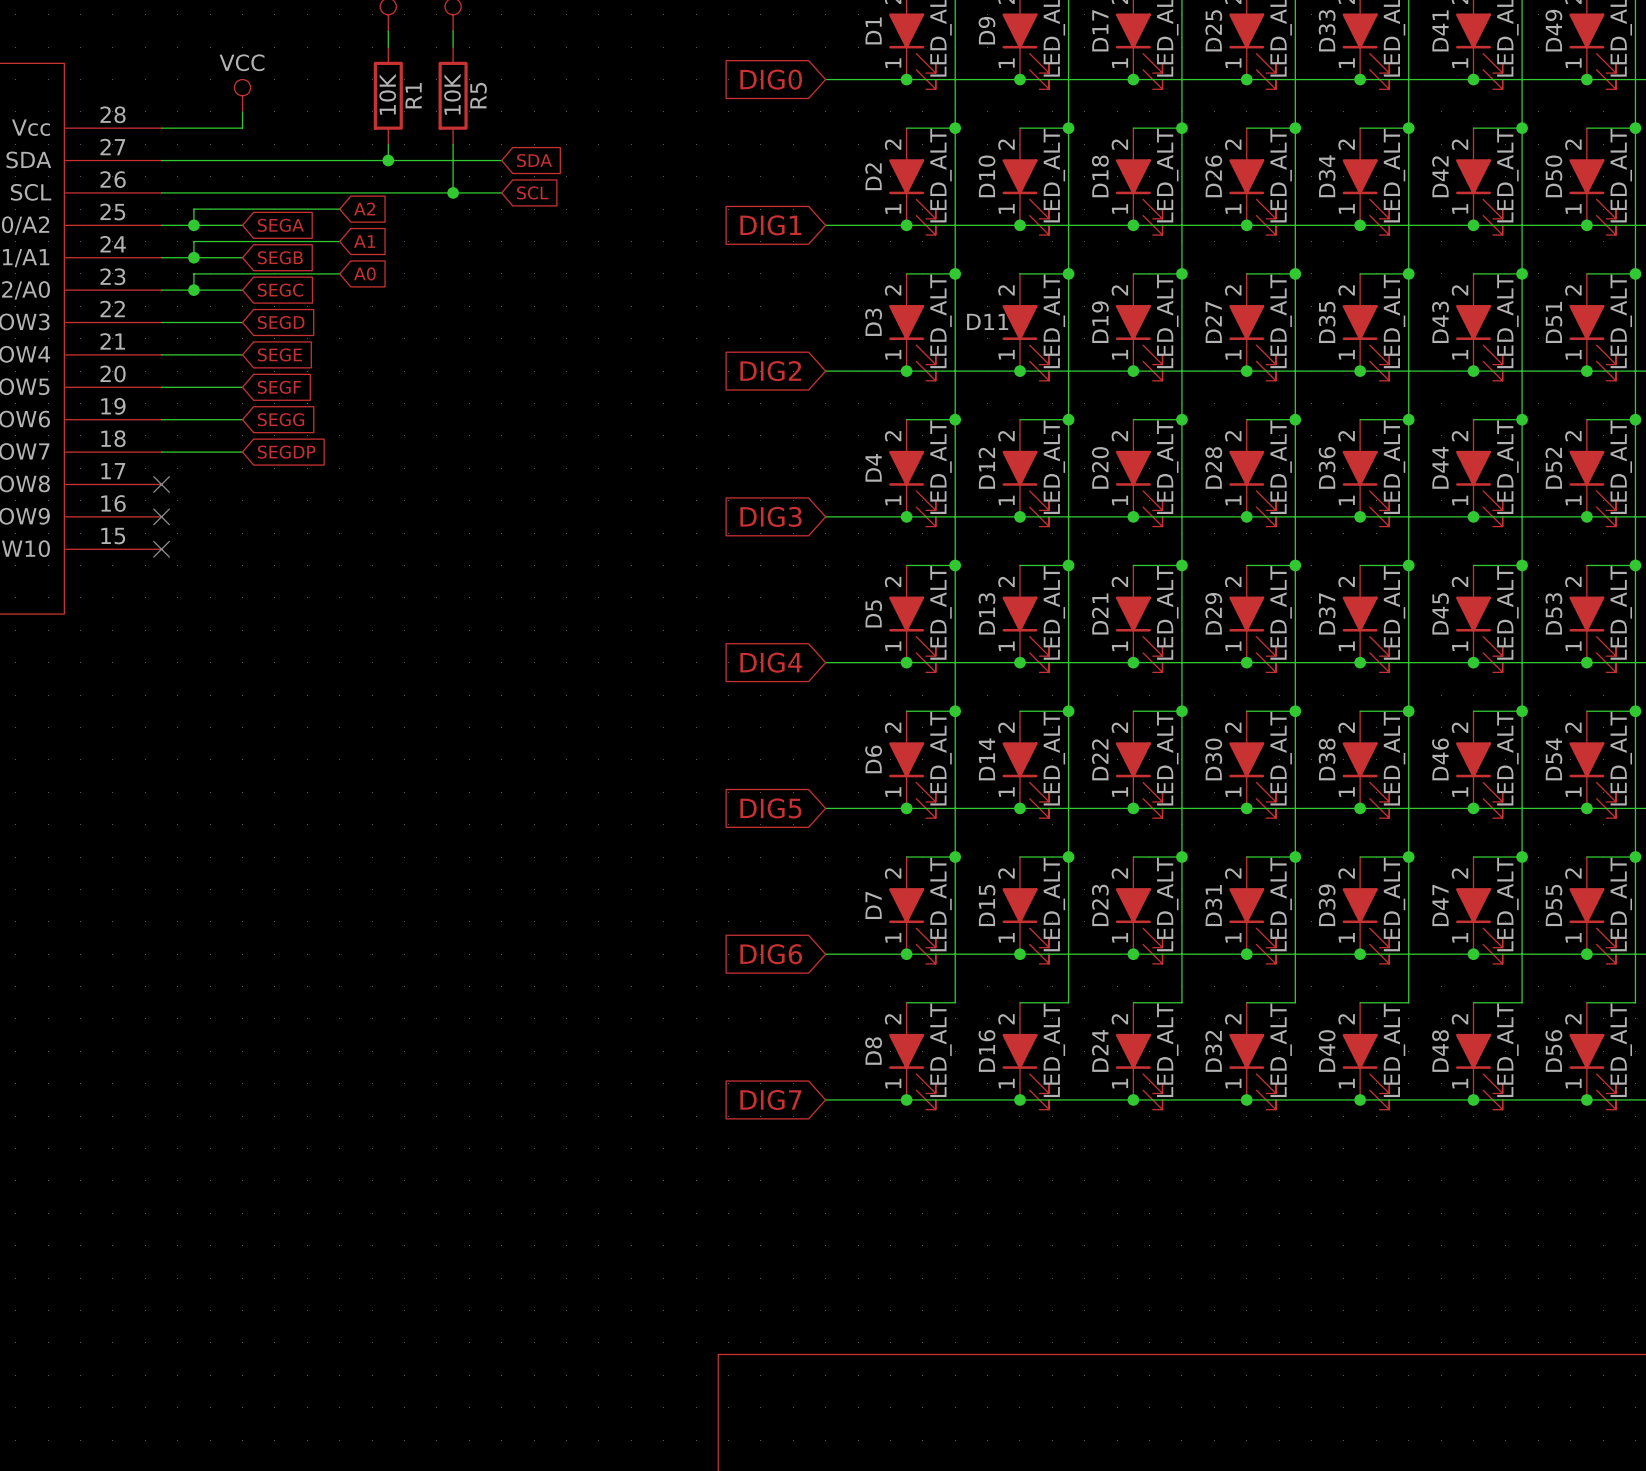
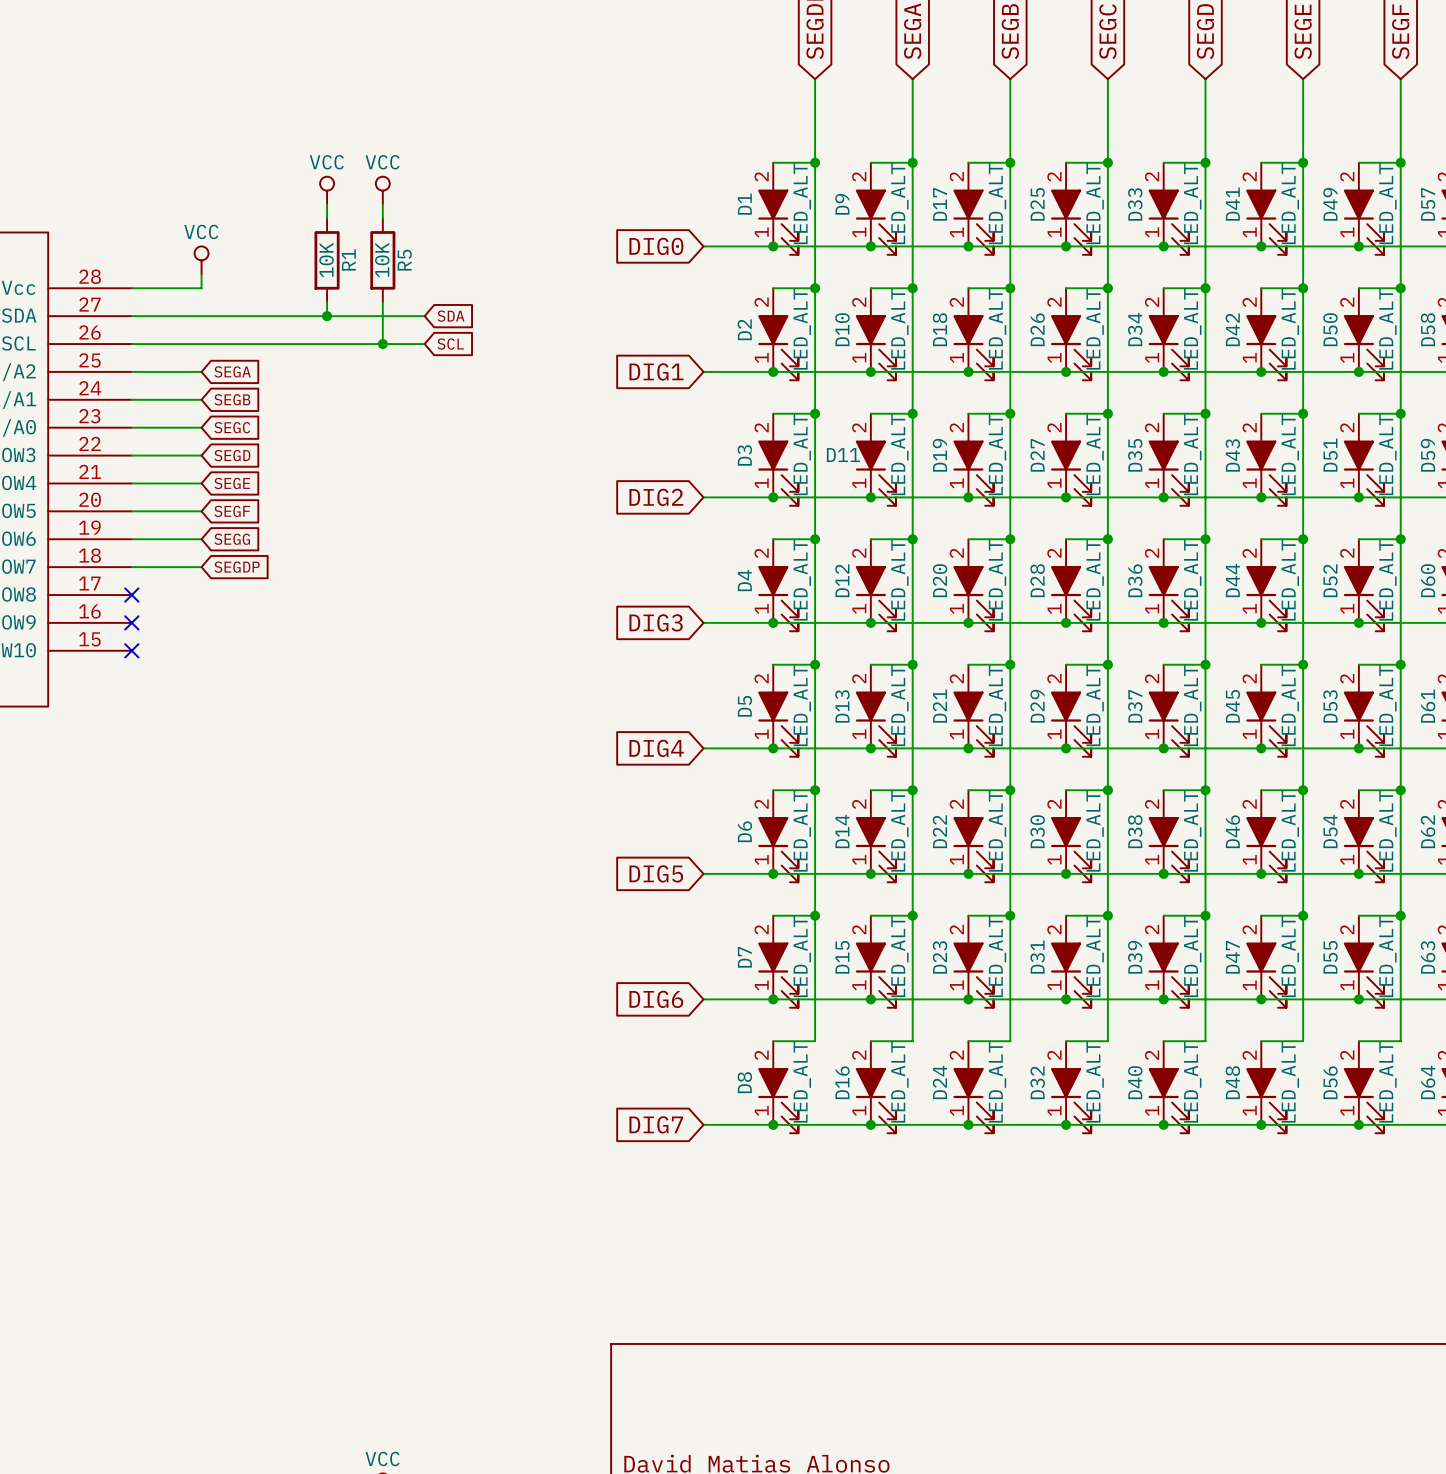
wire: (339, 209) (193, 209) (193, 225) -> none
global label: A2 (364, 209) -> none
junction: (193, 225) -> none
wire: (339, 241) (193, 241) (193, 257) -> none
global label: A1 (364, 241) -> none
junction: (193, 257) -> none
wire: (339, 273) (193, 273) (193, 290) -> none
global label: A0 (364, 273) -> none
junction: (193, 290) -> none

